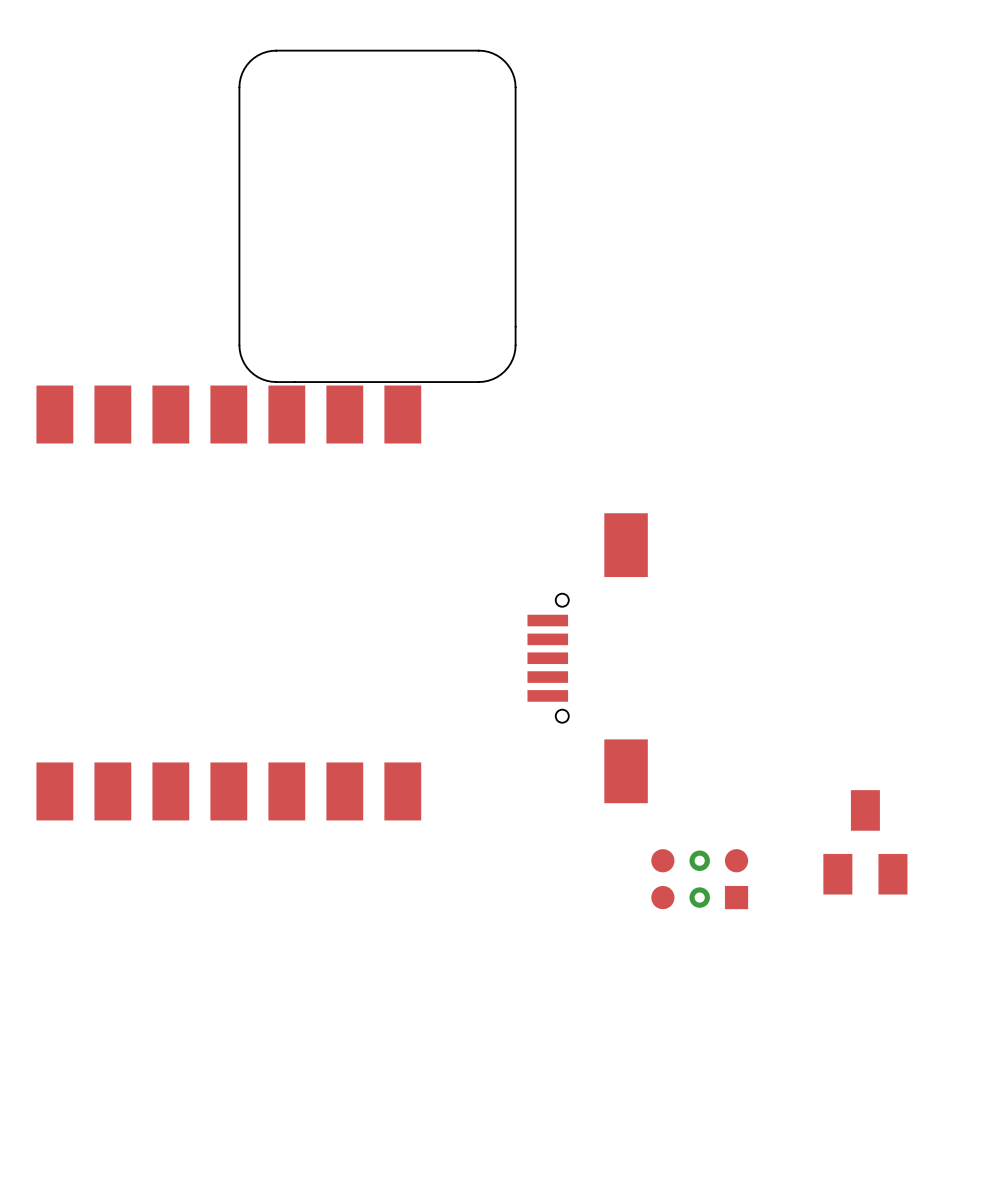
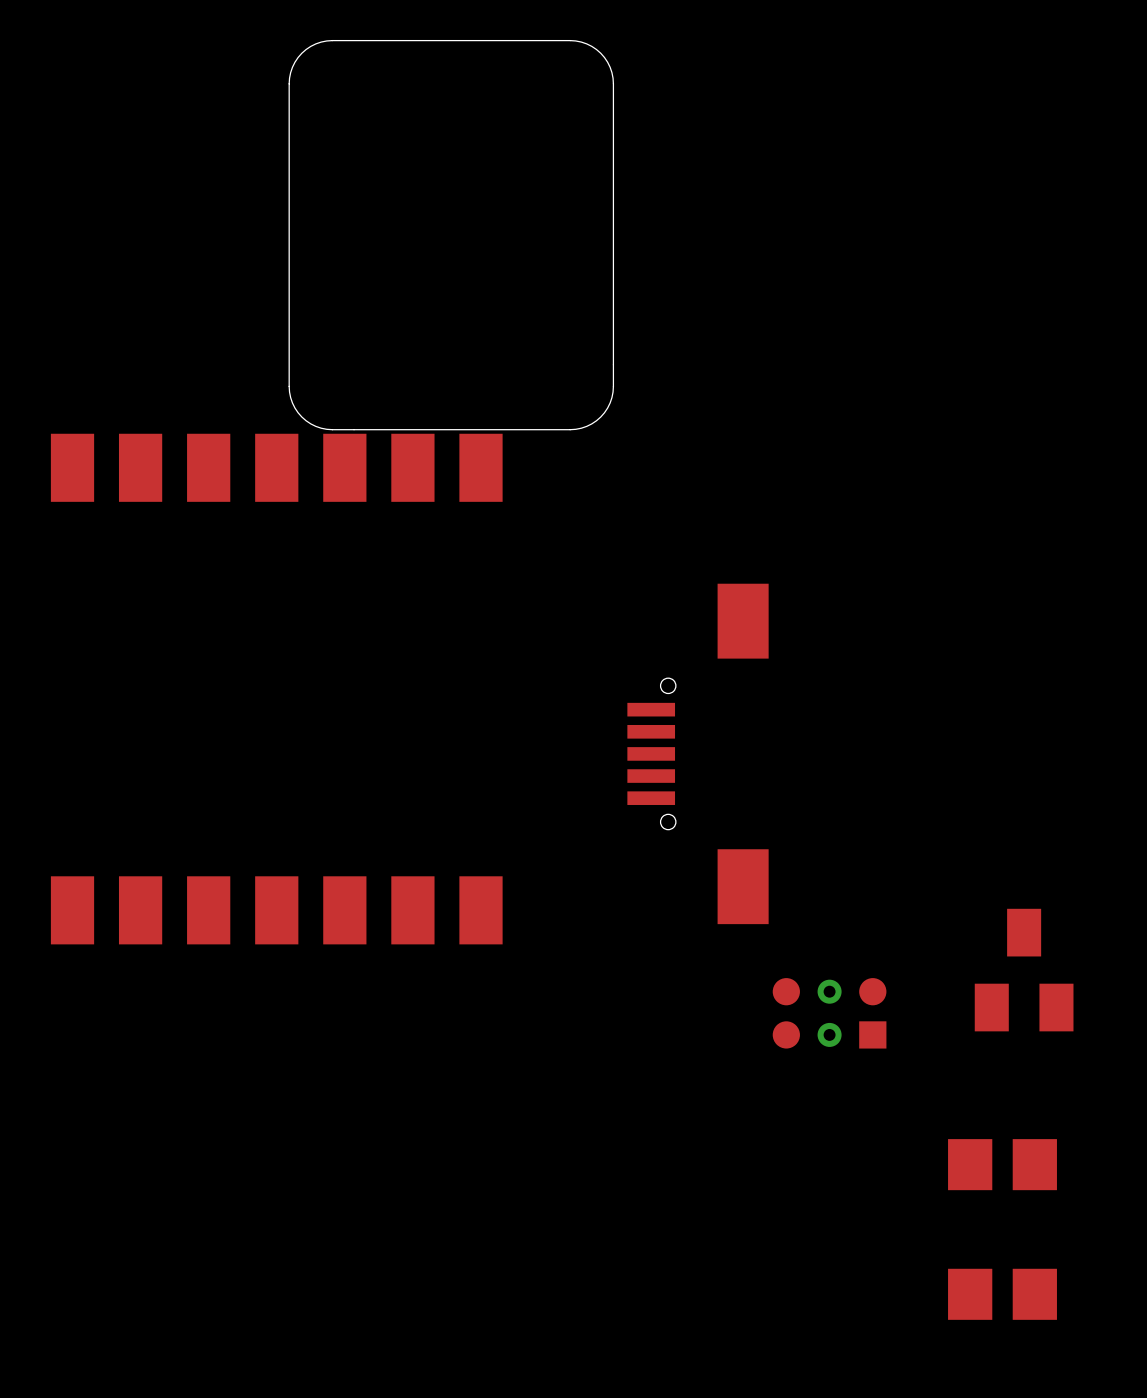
part: none -> (1002, 1164)
part: none -> (1002, 1294)

